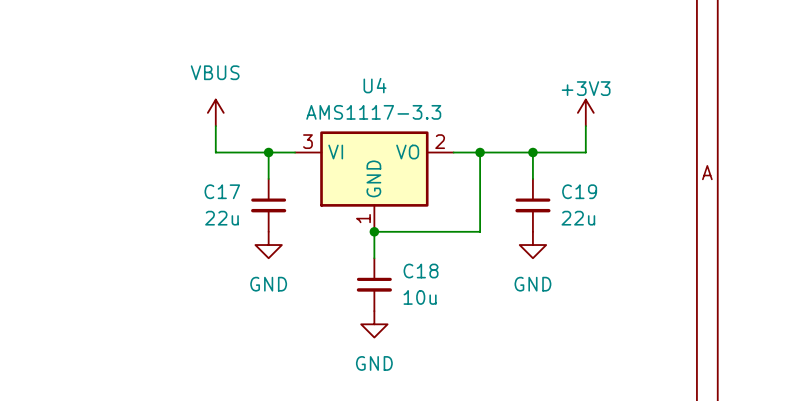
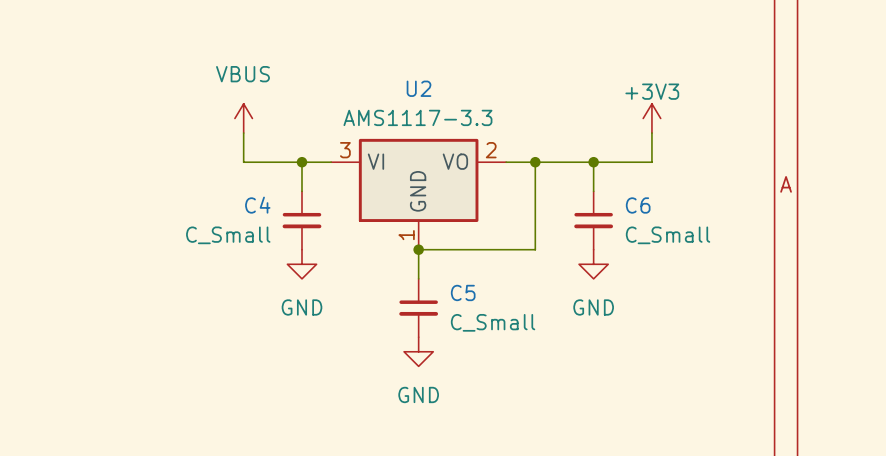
U4 name: U4 (375, 85) -> U2 (418, 88)
C17 name: C17 (222, 191) -> C4 (257, 205)
C19 name: C19 (579, 191) -> C6 (638, 205)
C17 value: 22u (221, 218) -> C_Small (228, 235)
C19 value: 22u (578, 218) -> C_Small (668, 235)
C18 name: C18 (421, 271) -> C5 (463, 292)
C18 value: 10u (420, 297) -> C_Small (493, 322)

